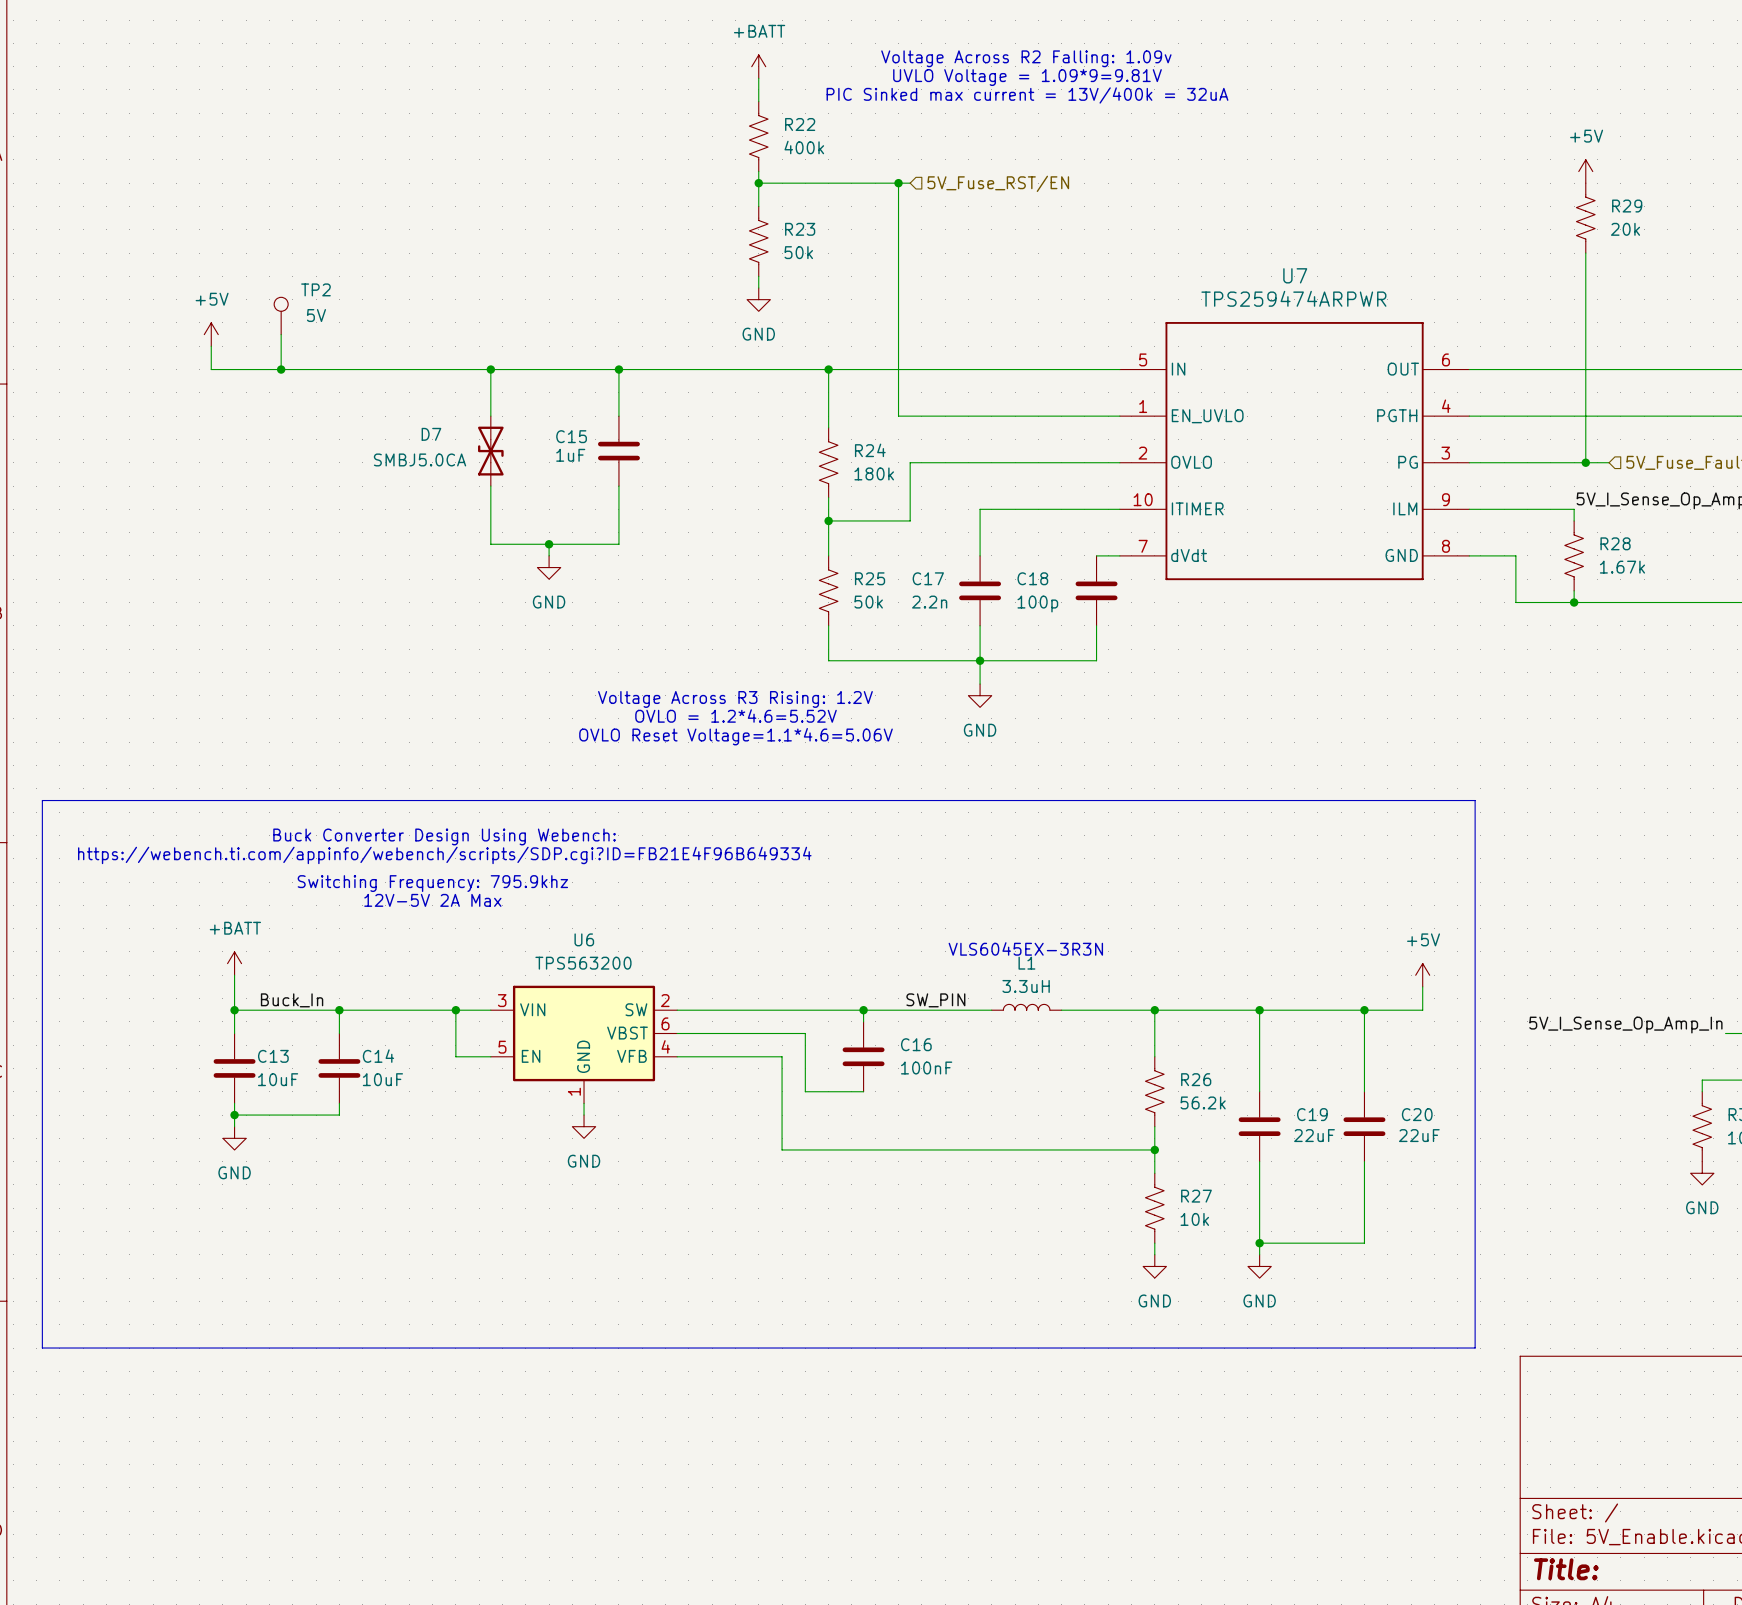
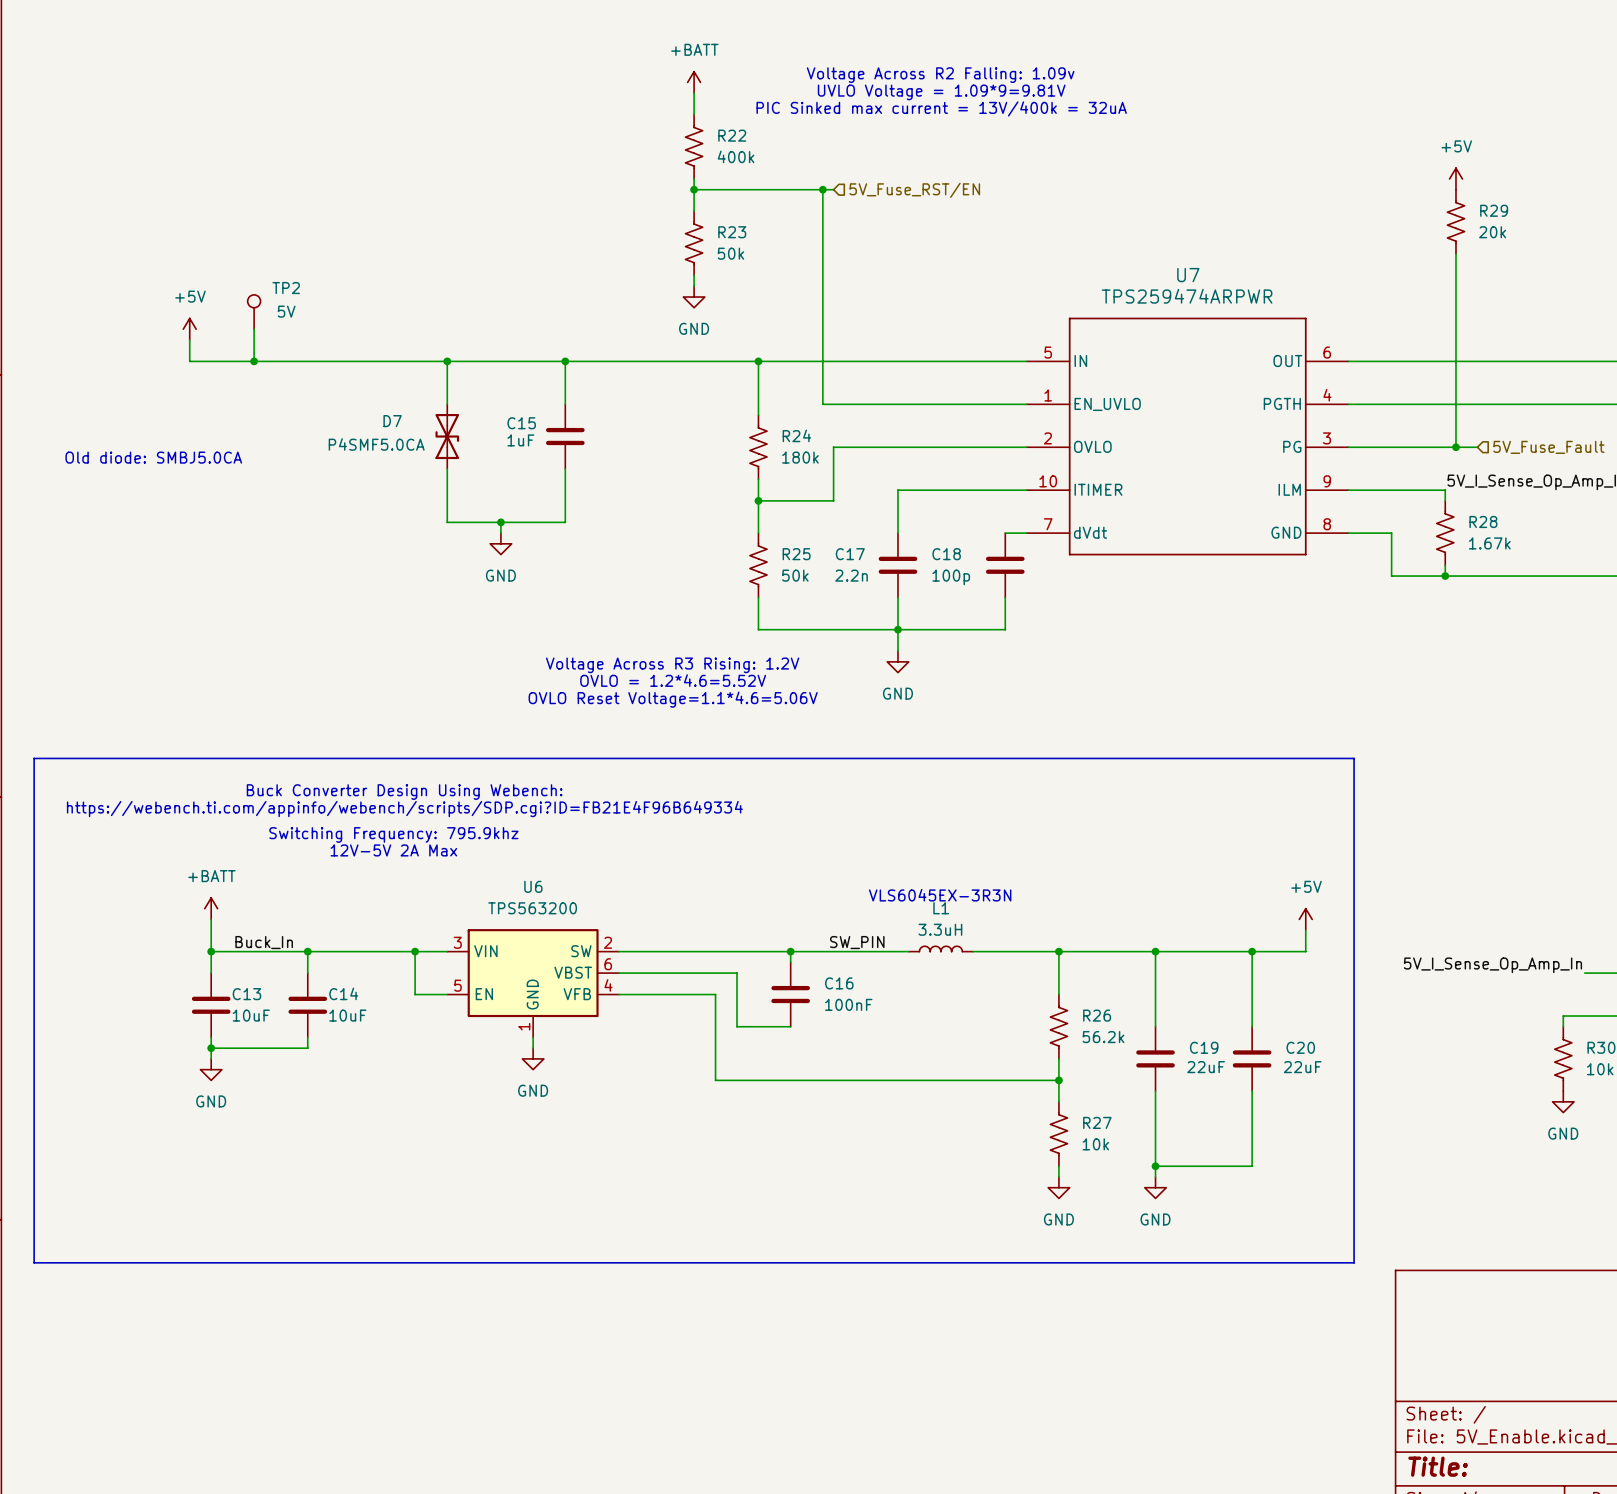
D7 value: SMBJ5.0CA (420, 459) -> P4SMF5.0CA (376, 444)
text: none -> Old diode: SMBJ5.0CA (153, 457)

